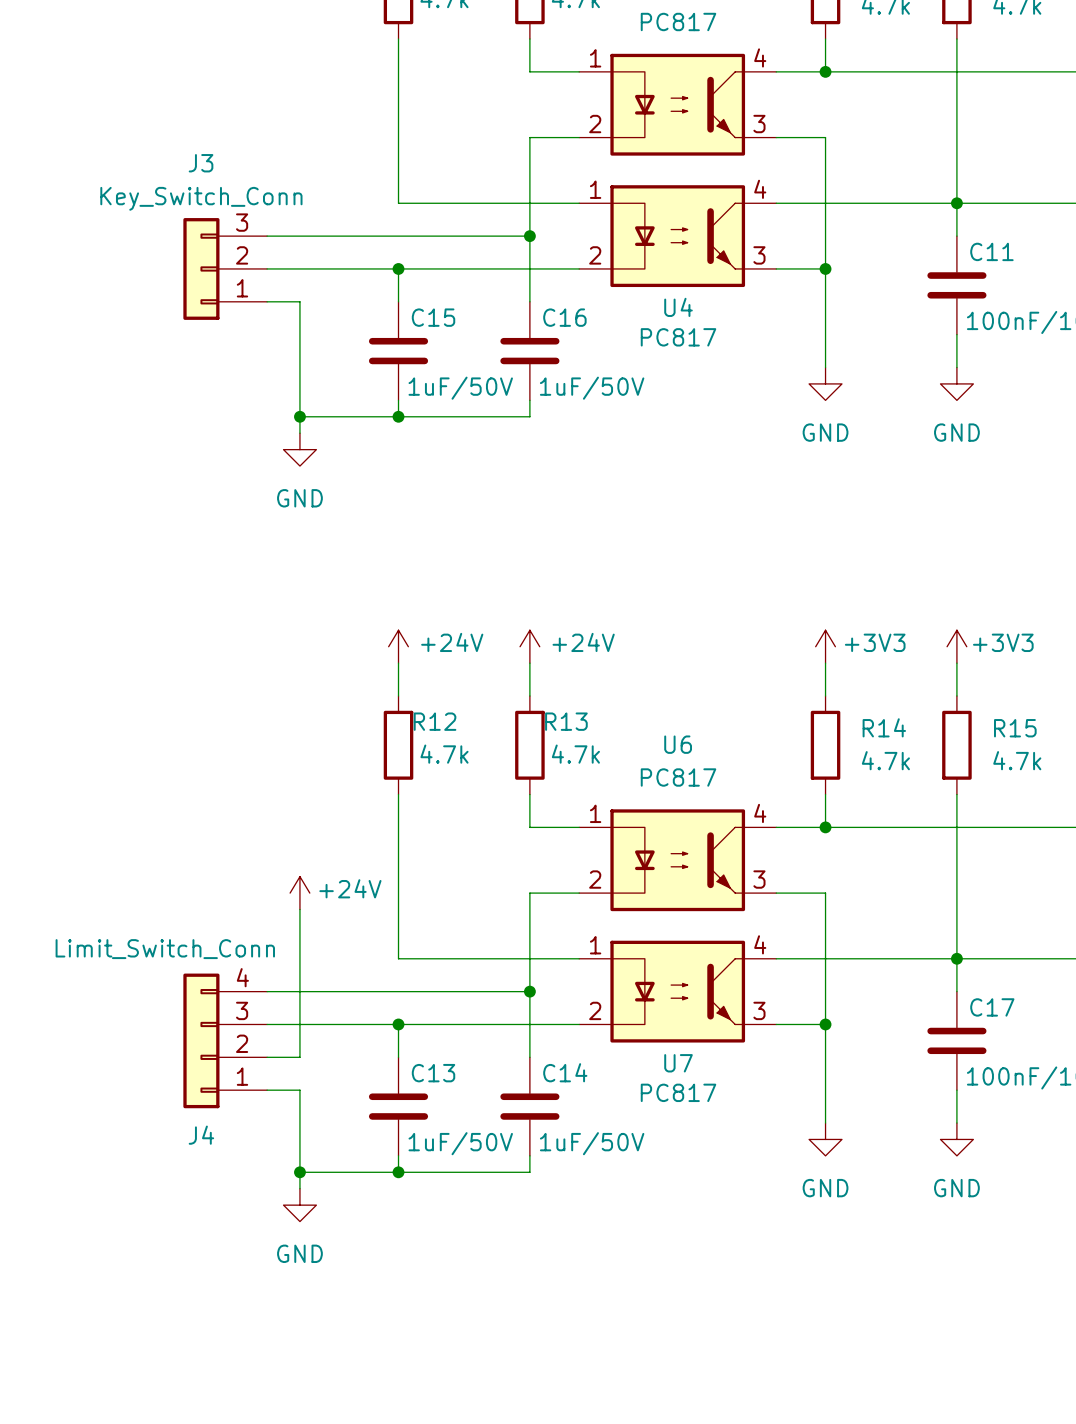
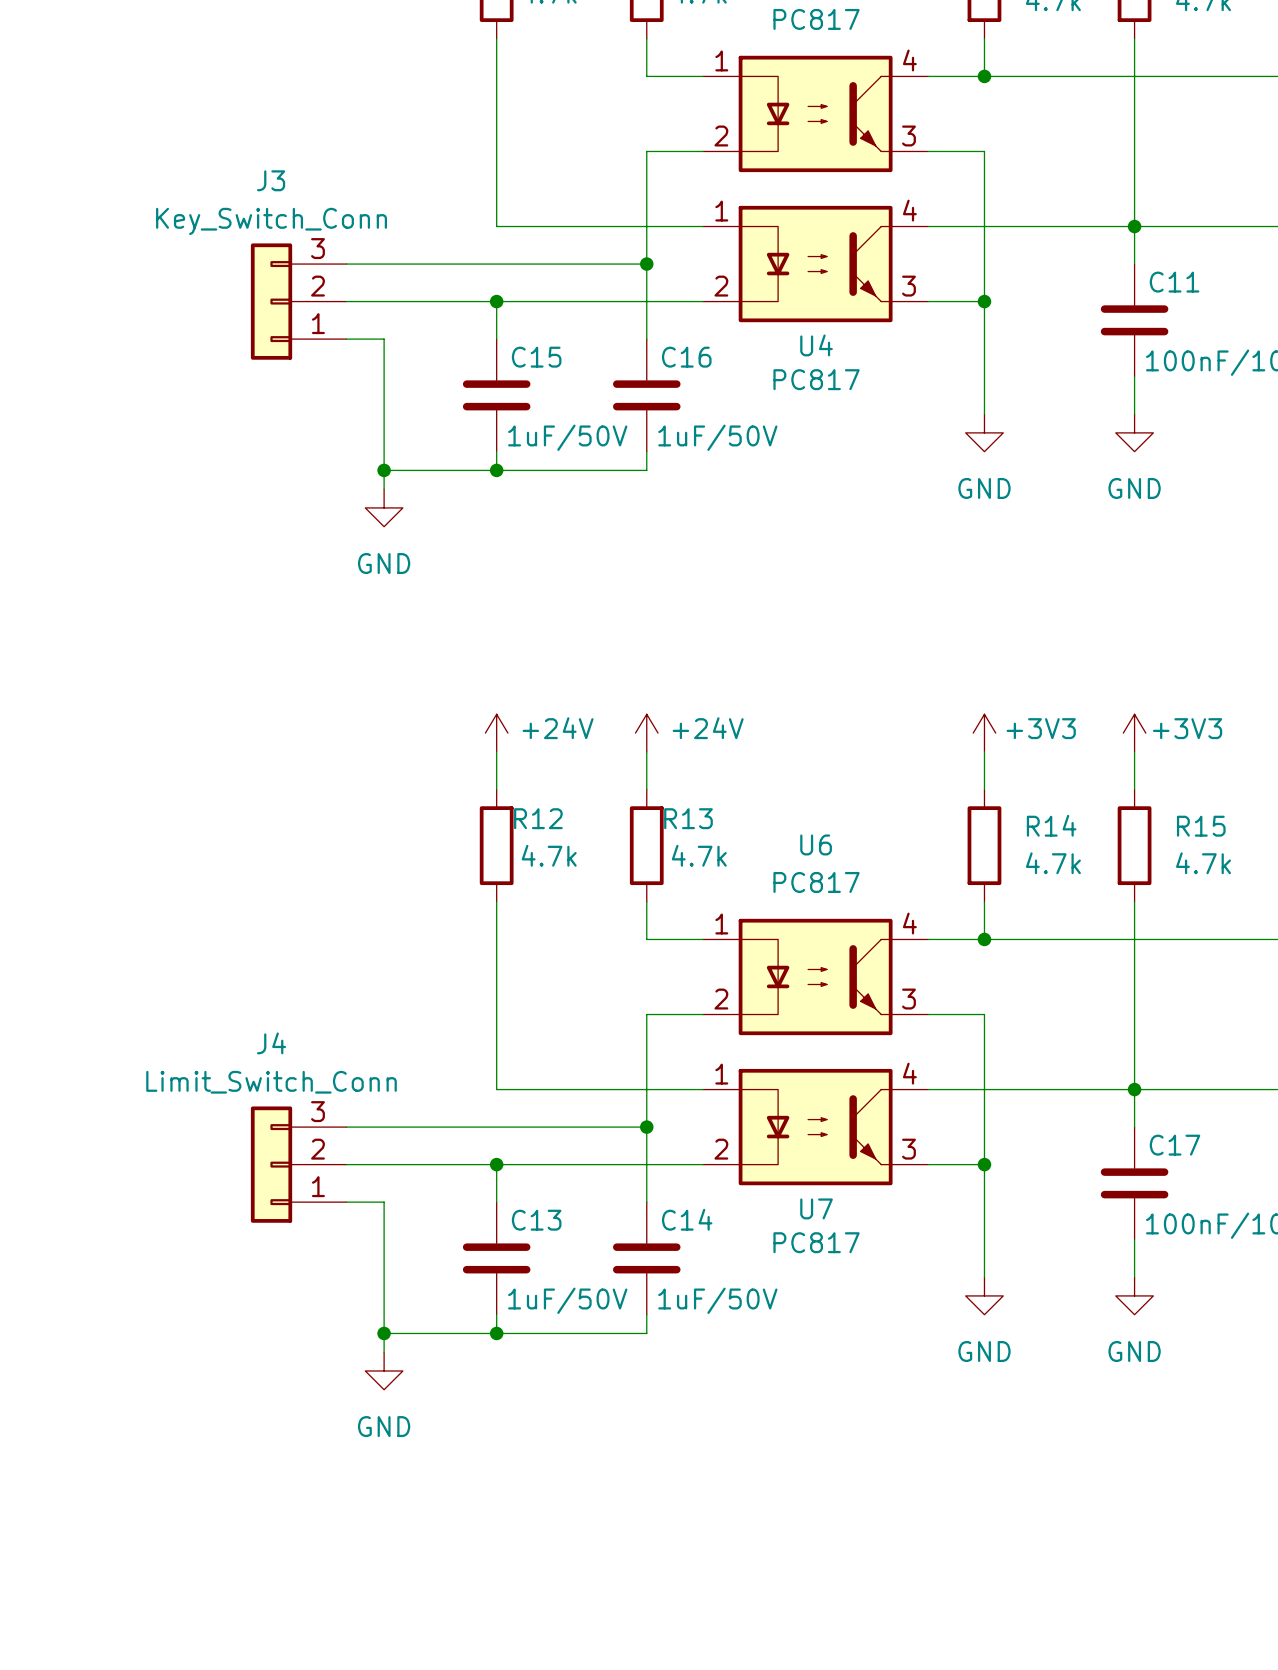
power symbol: +24V (299, 893) -> none
wire: (299, 909) (299, 1057) -> none
J4 value position: Limit_Switch_Conn (165, 949) -> Limit_Switch_Conn (271, 1082)
J4 symbol: [183, 973, 268, 1109] -> [250, 1106, 347, 1223]
wire: (267, 1090) (299, 1090) -> (384, 1202) (384, 1239)
J4 name position: J4 (201, 1135) -> J4 (271, 1043)

